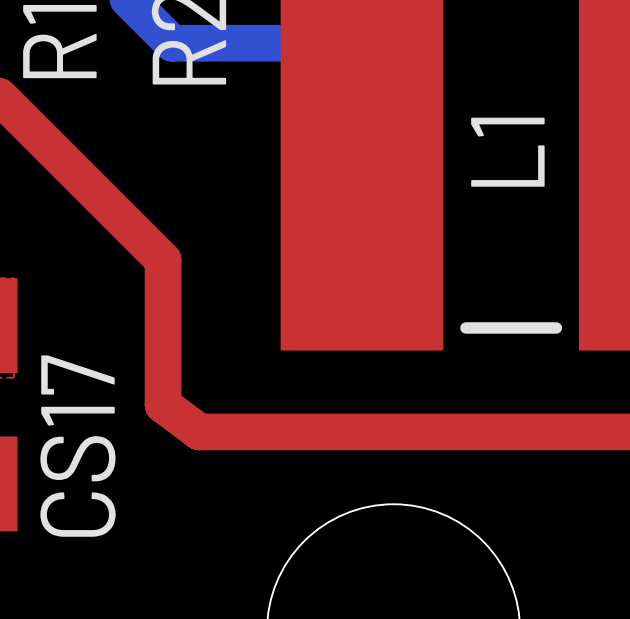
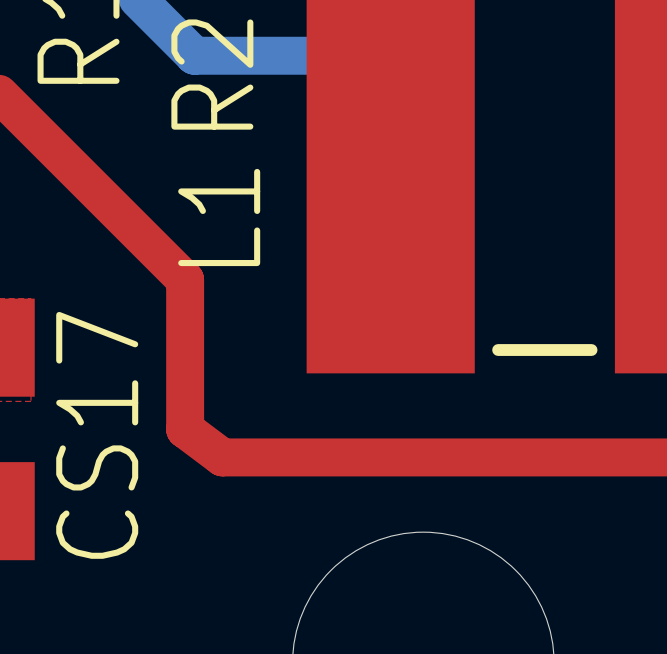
L1 name position: L1 (507, 152) -> L1 (219, 217)

